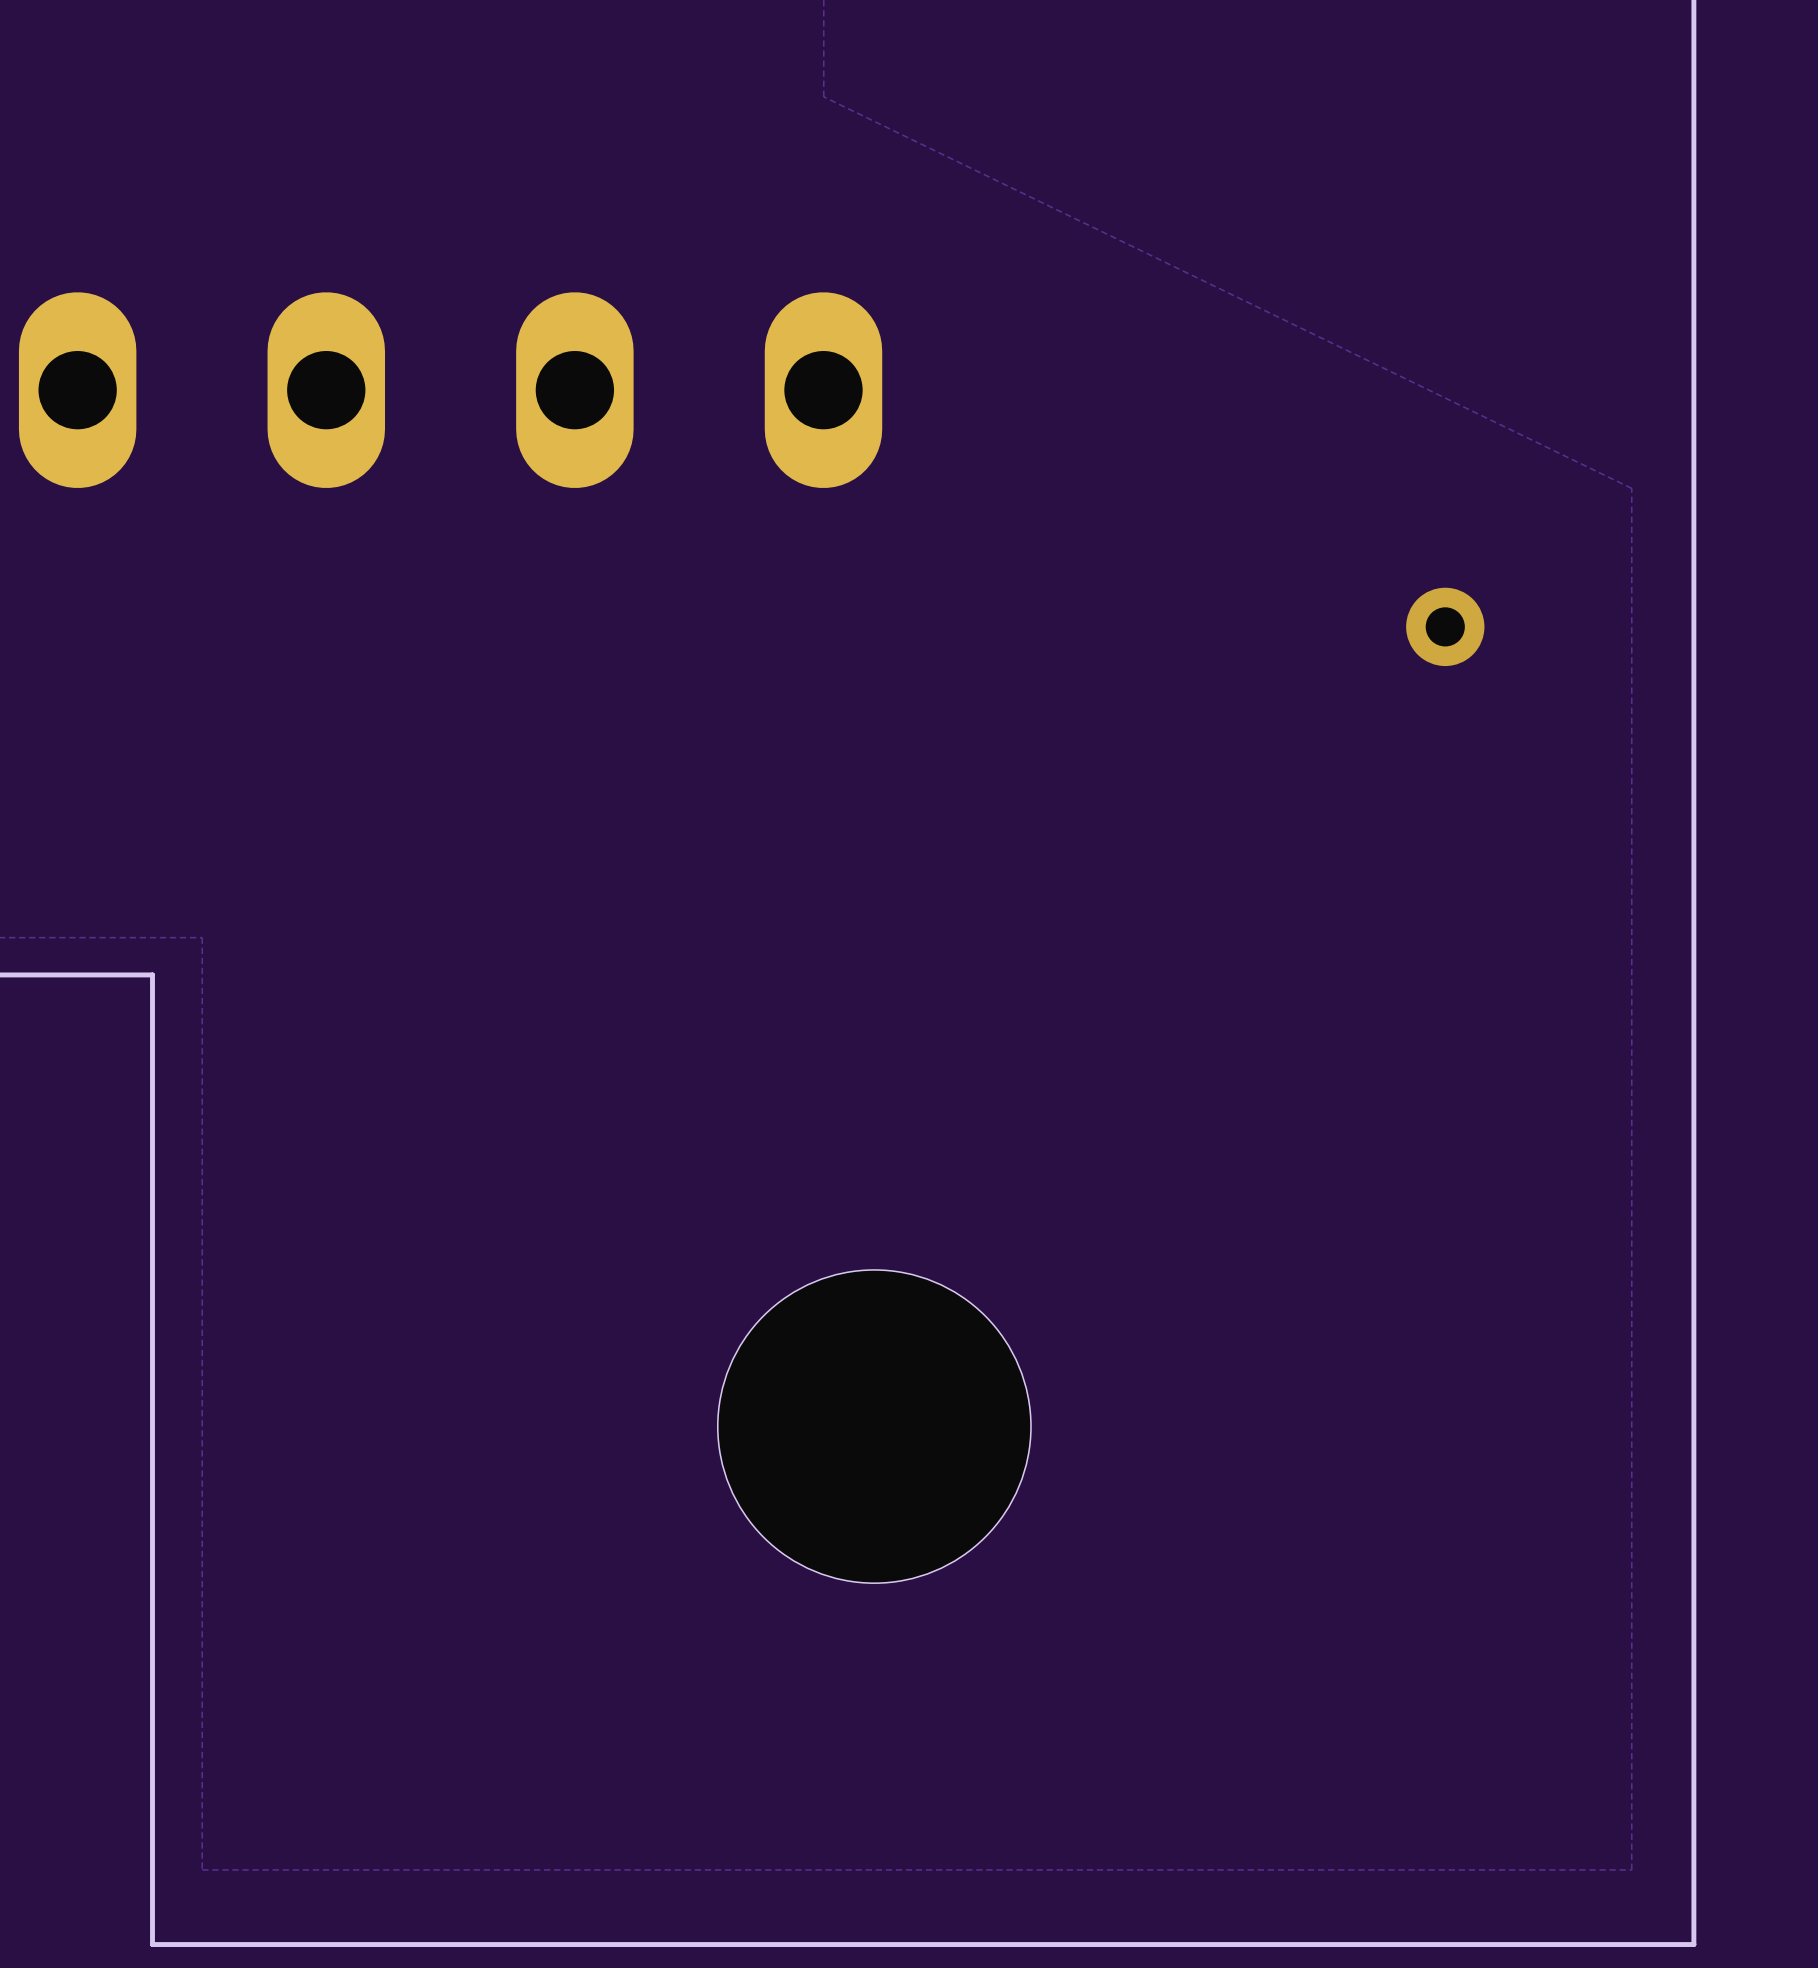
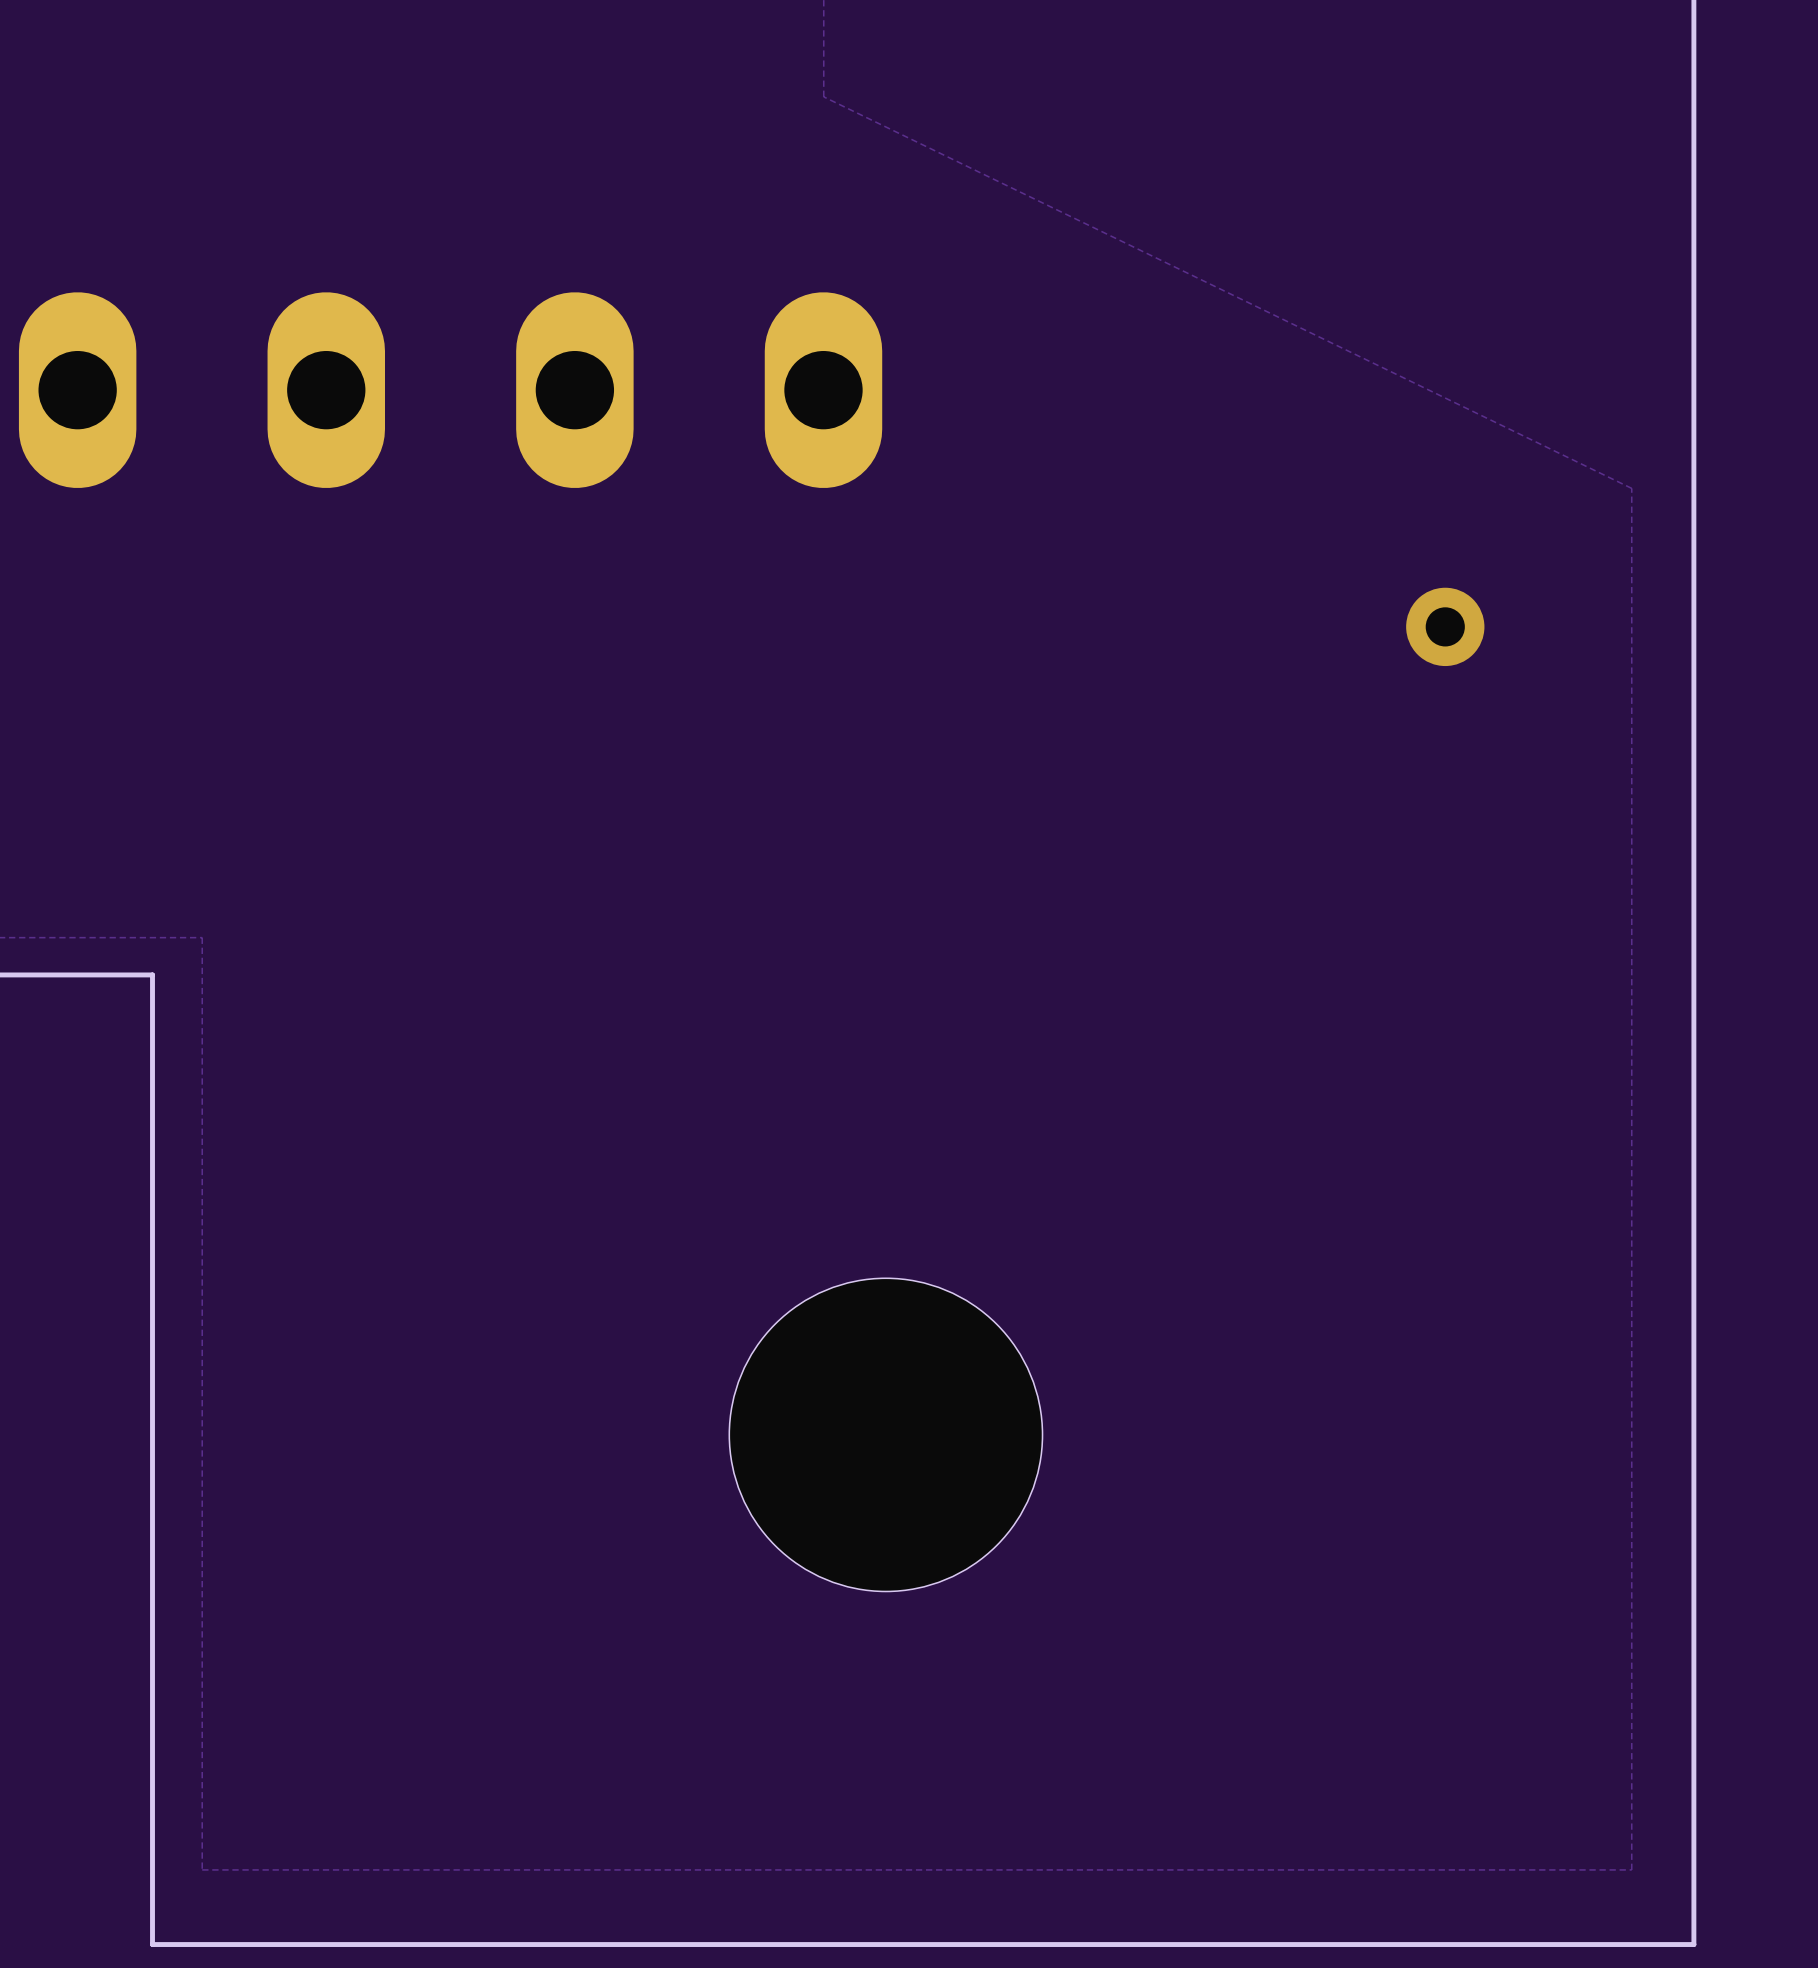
part position: (874, 1426) -> (885, 1434)

